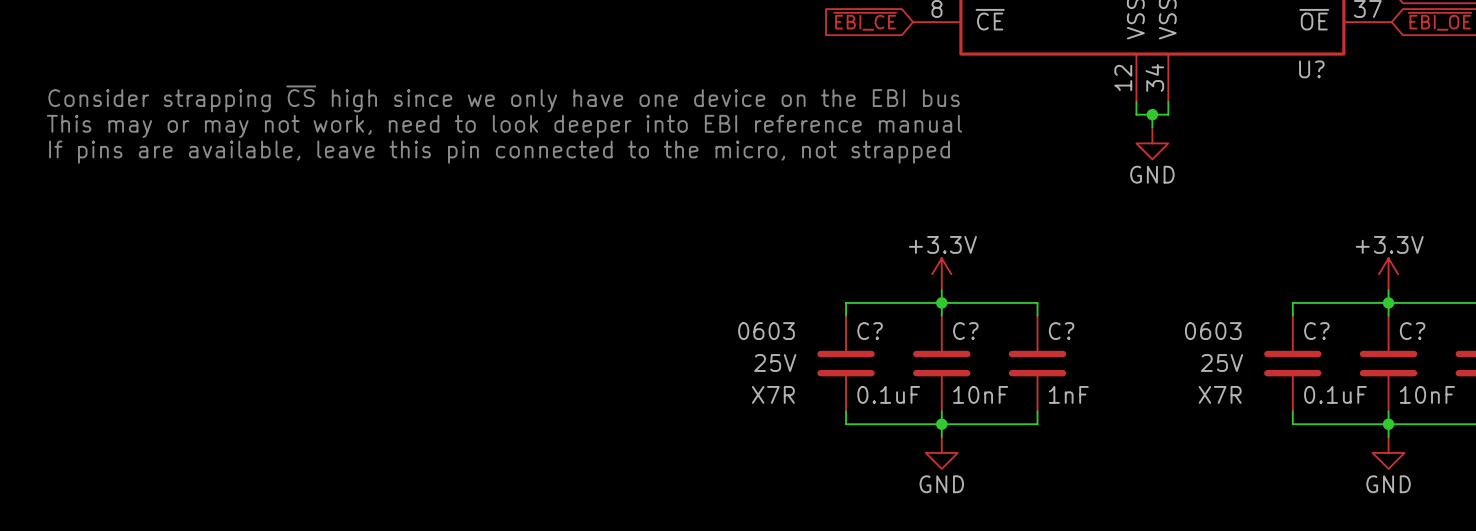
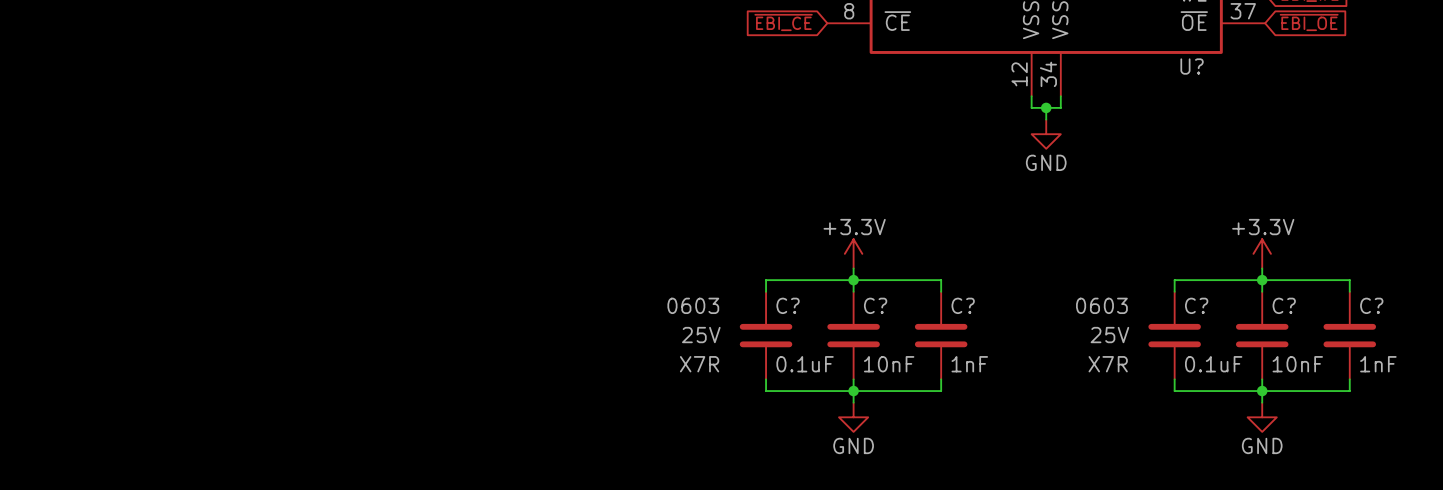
text: Consider strapping ~{CS} high since we only have one device on the EBI bus (504, 98) -> none
text: This may or may not work, need to look deeper into EBI reference manual (504, 126) -> none
text: If pins are available, leave this pin connected to the micro, not strapped (499, 152) -> none

